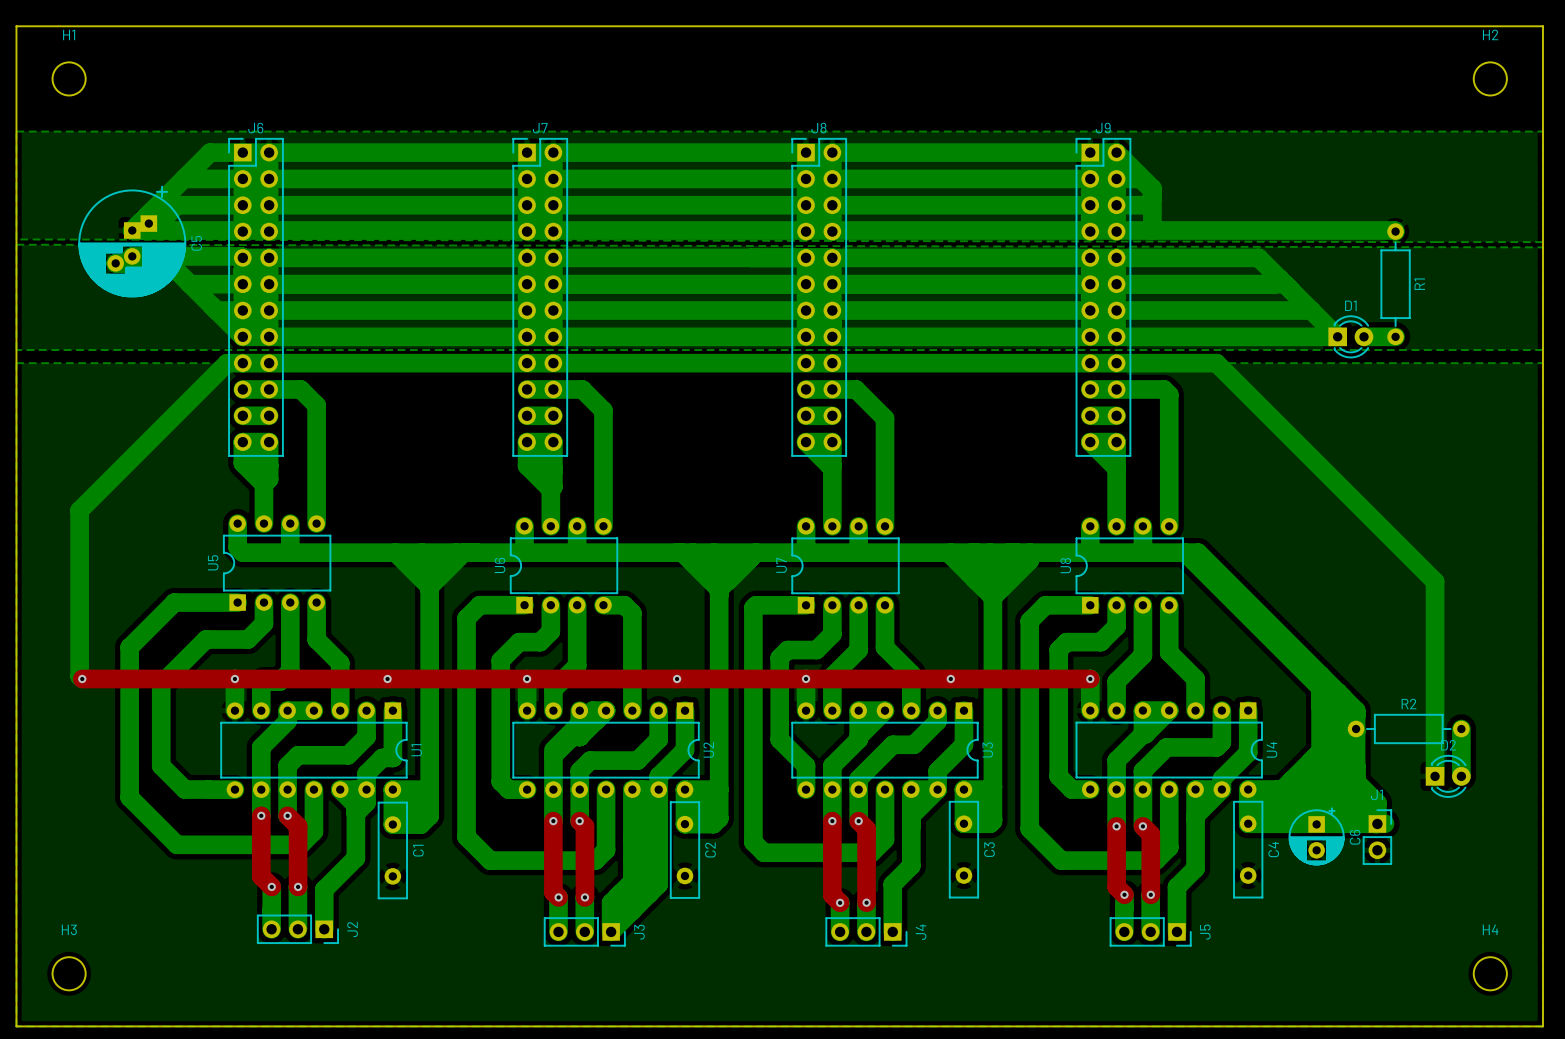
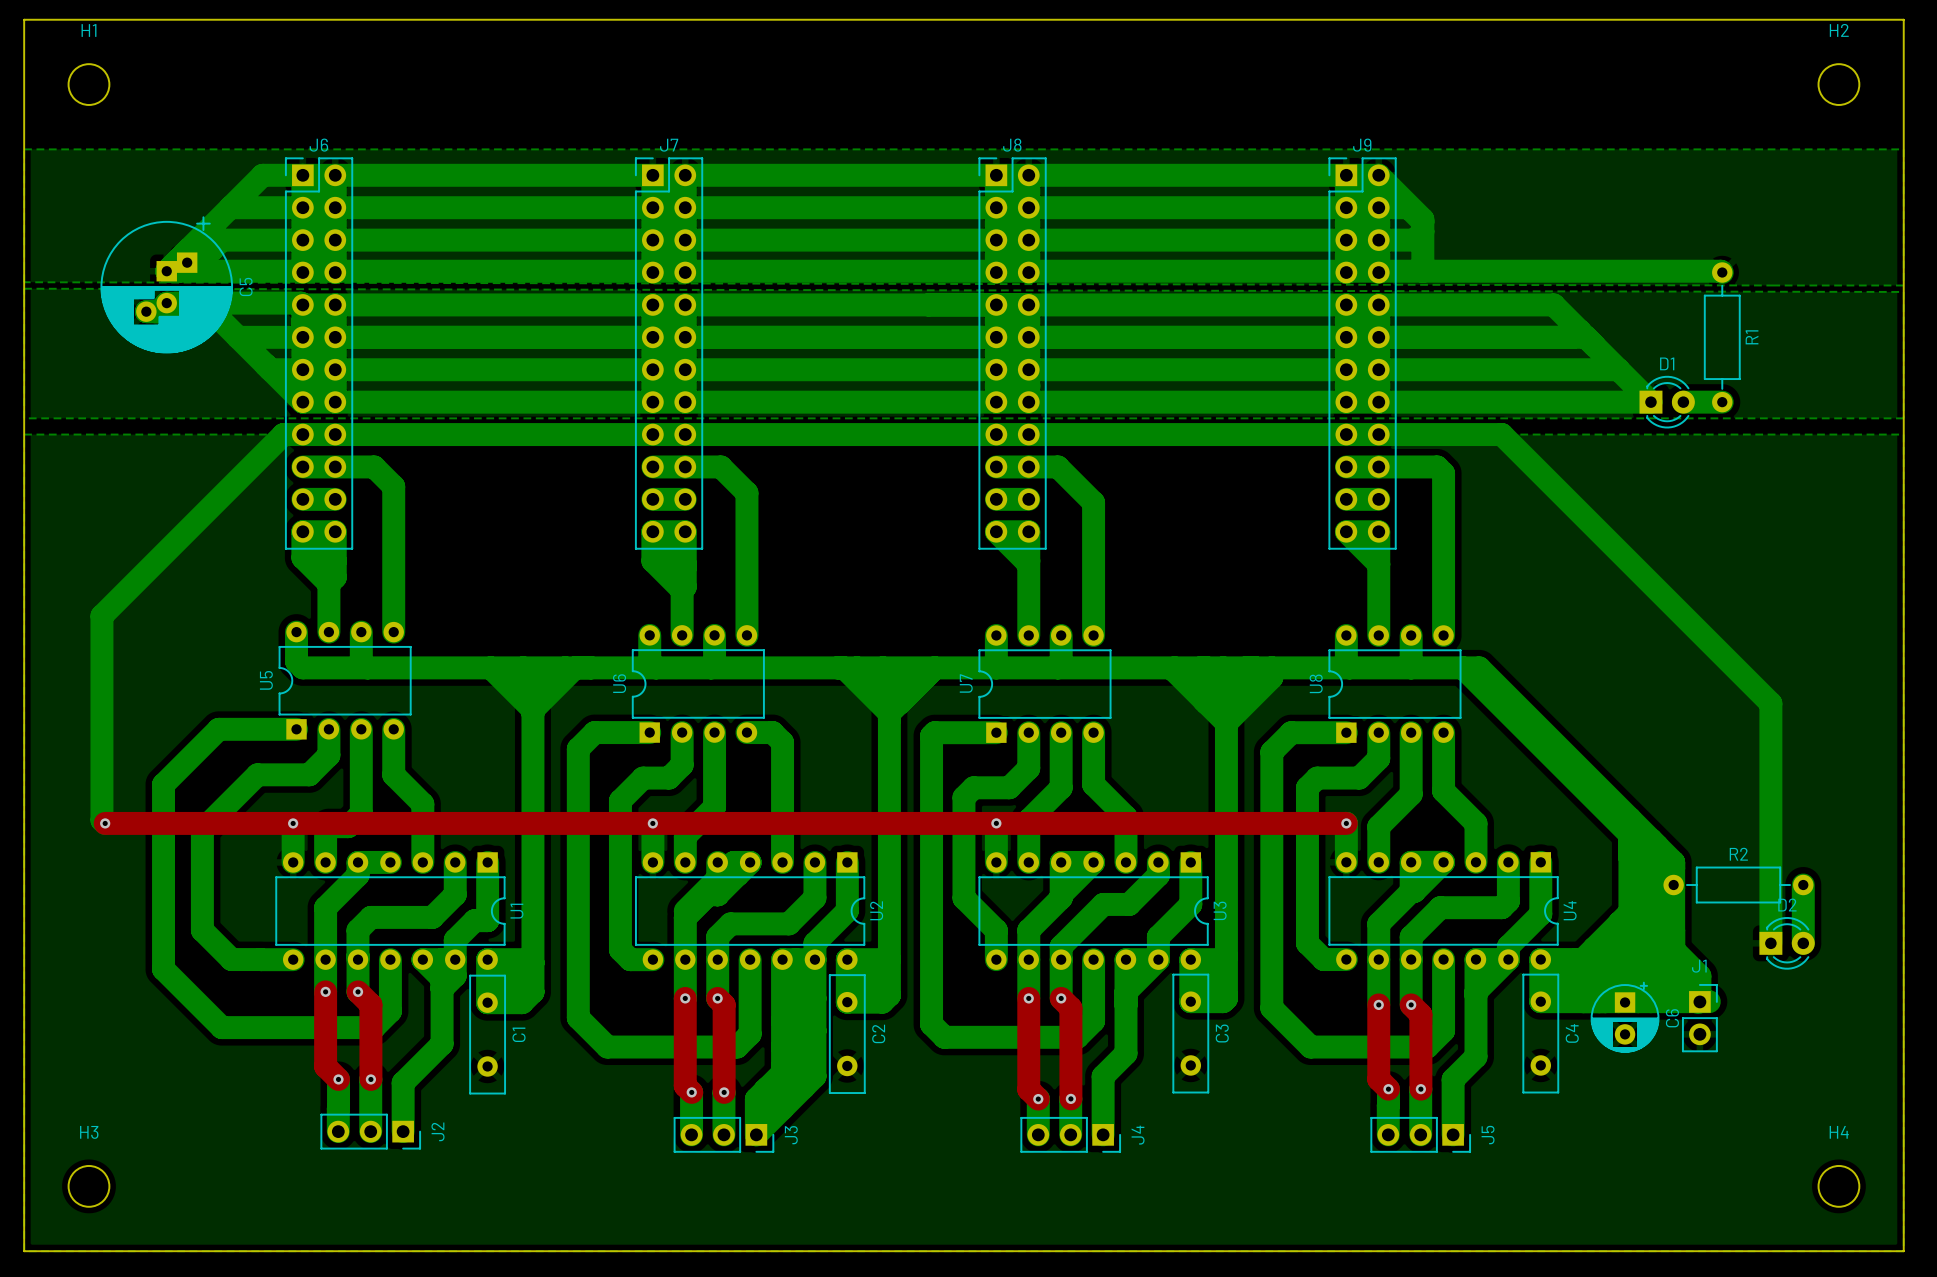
via: (387, 678) -> none
via: (677, 678) -> none
via: (950, 678) -> none

